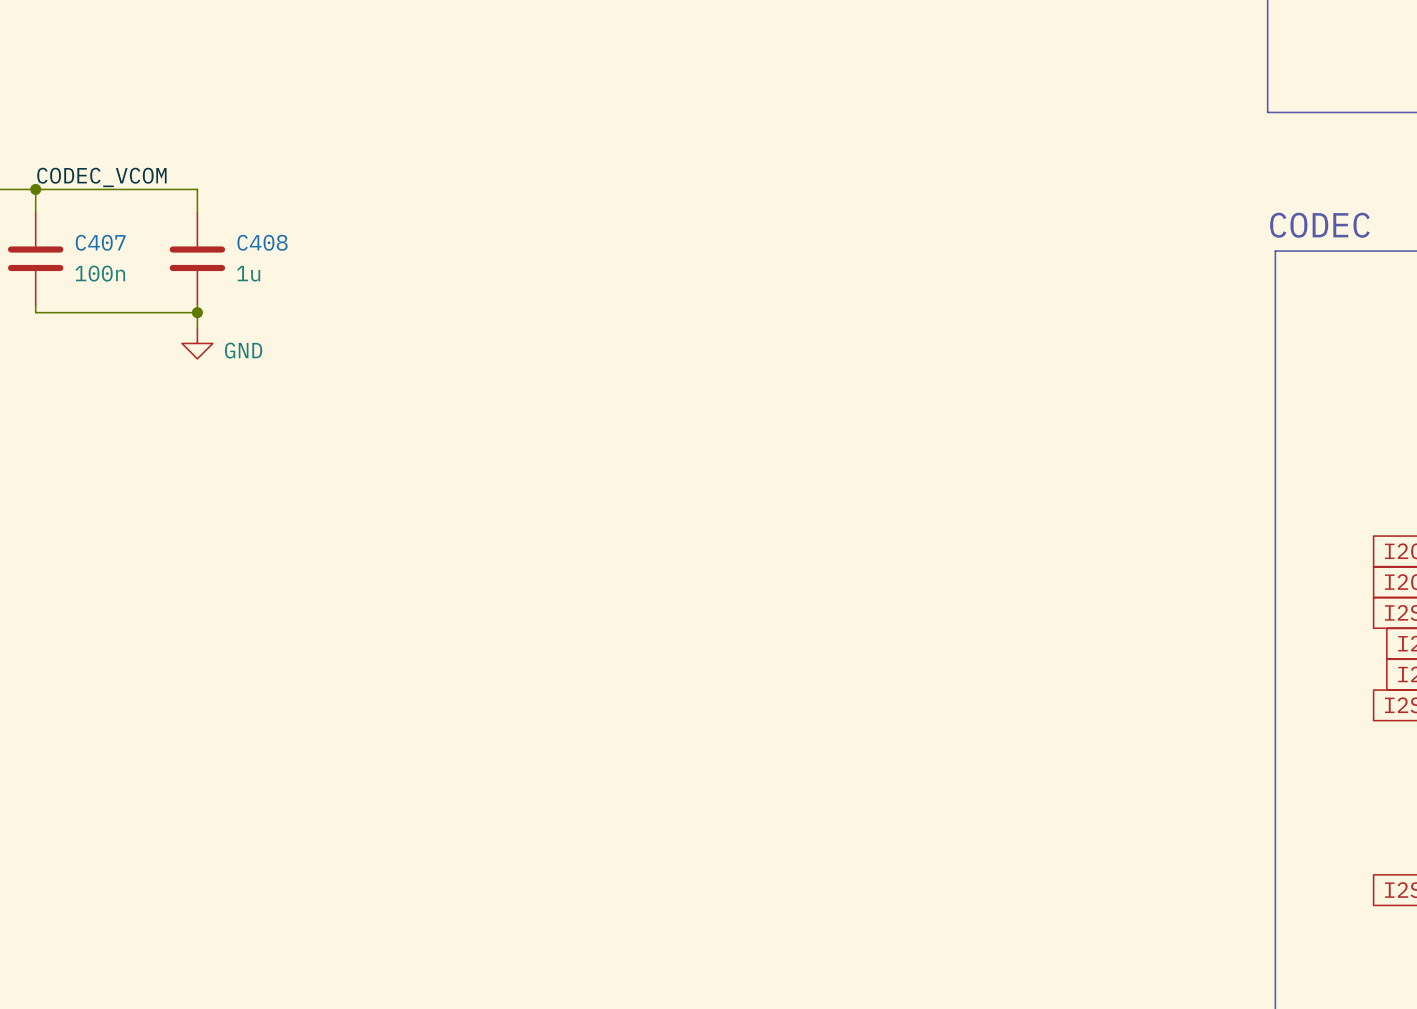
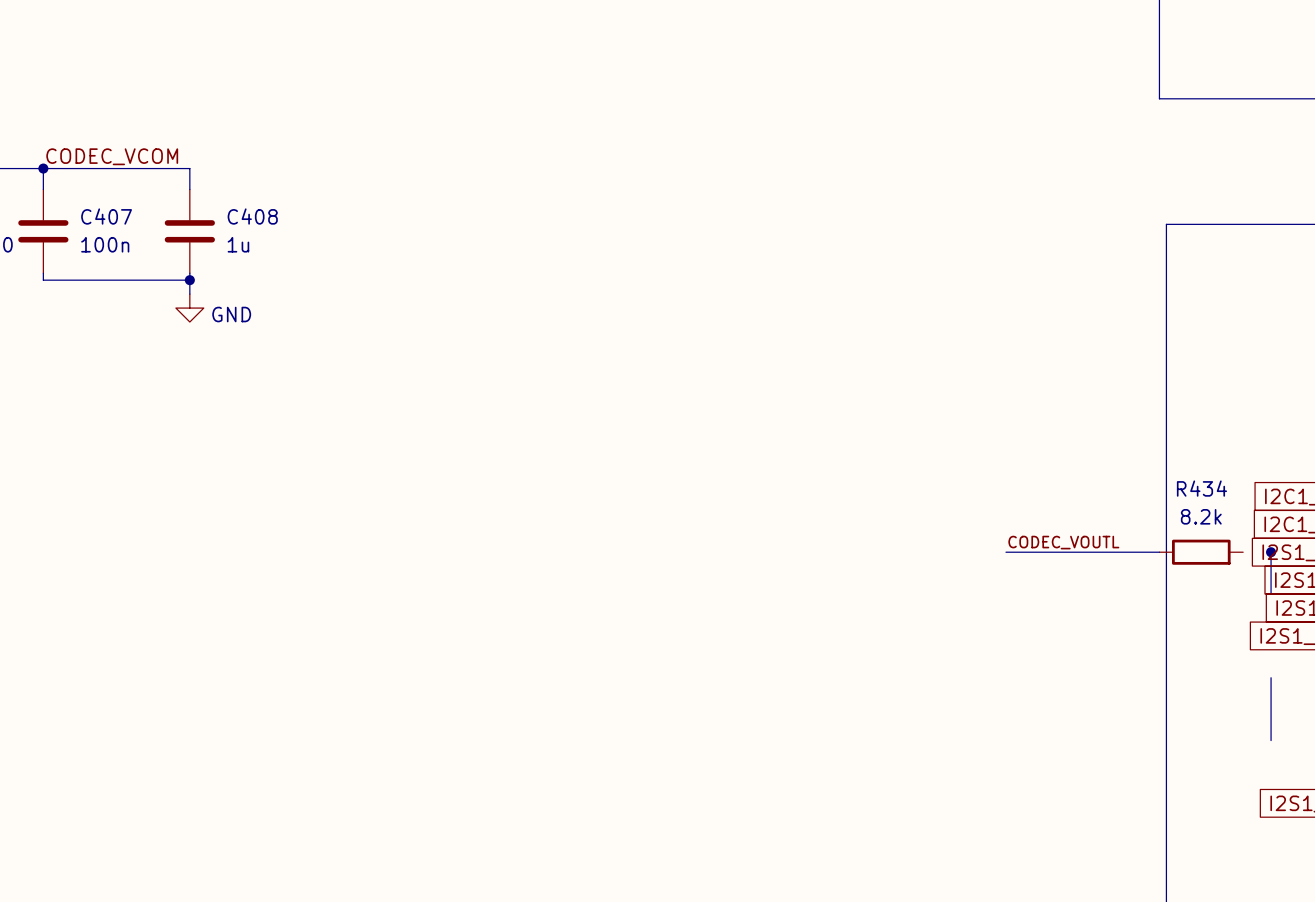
text: CODEC (1319, 225) -> none
label: none -> CODEC_VOUTL (1063, 542)
wire: none -> (1005, 552) (1159, 552)
R434: none -> 8.2k (1201, 552)
wire: none -> (1271, 552) (1271, 594)
junction: none -> (1271, 552)
wire: none -> (1271, 677) (1271, 740)

